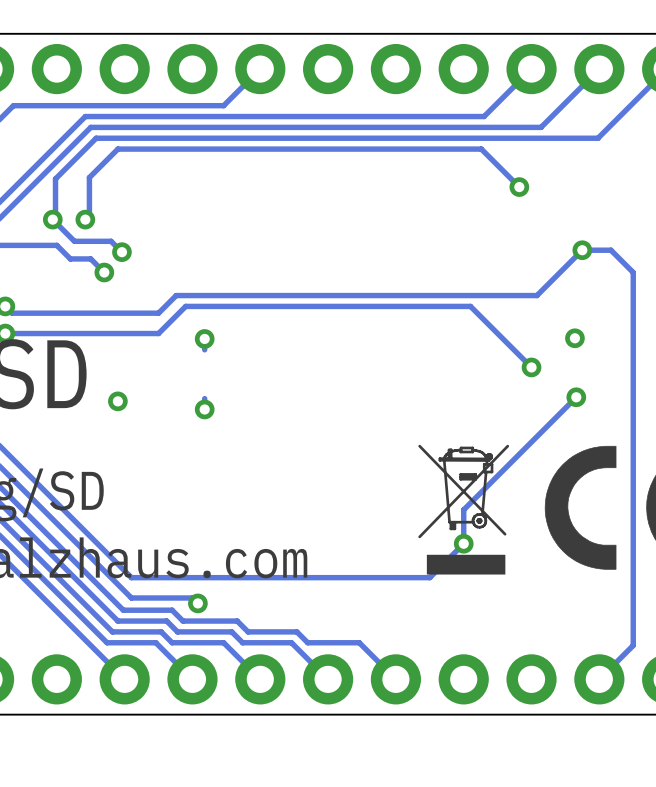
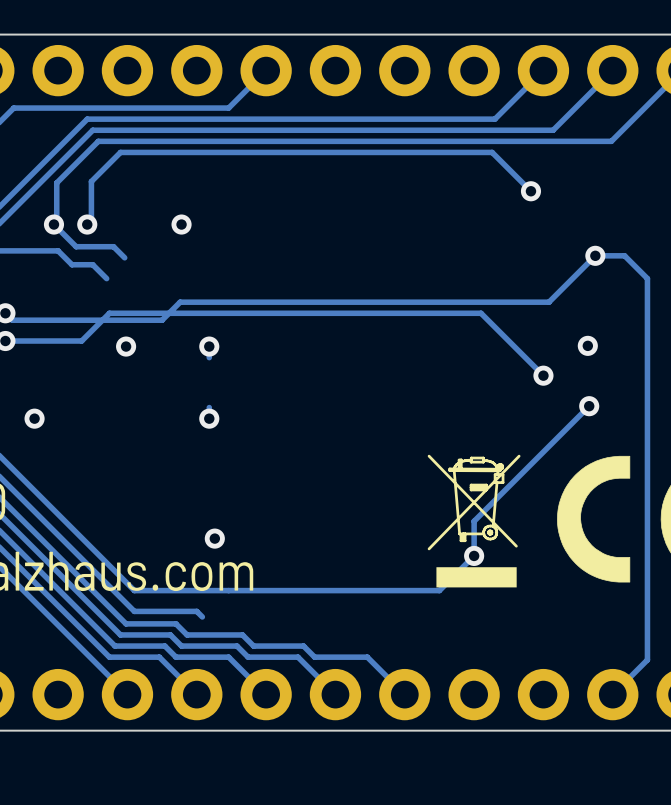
via: none -> (181, 224)
via: (121, 252) -> none
via: (104, 272) -> none
track: (185, 306) (158, 333) (79, 333) -> (189, 313) (109, 313) (81, 341)
via: none -> (126, 346)
via: (117, 401) -> none
via: none -> (34, 418)
via: none -> (214, 538)
via: (197, 603) -> none

